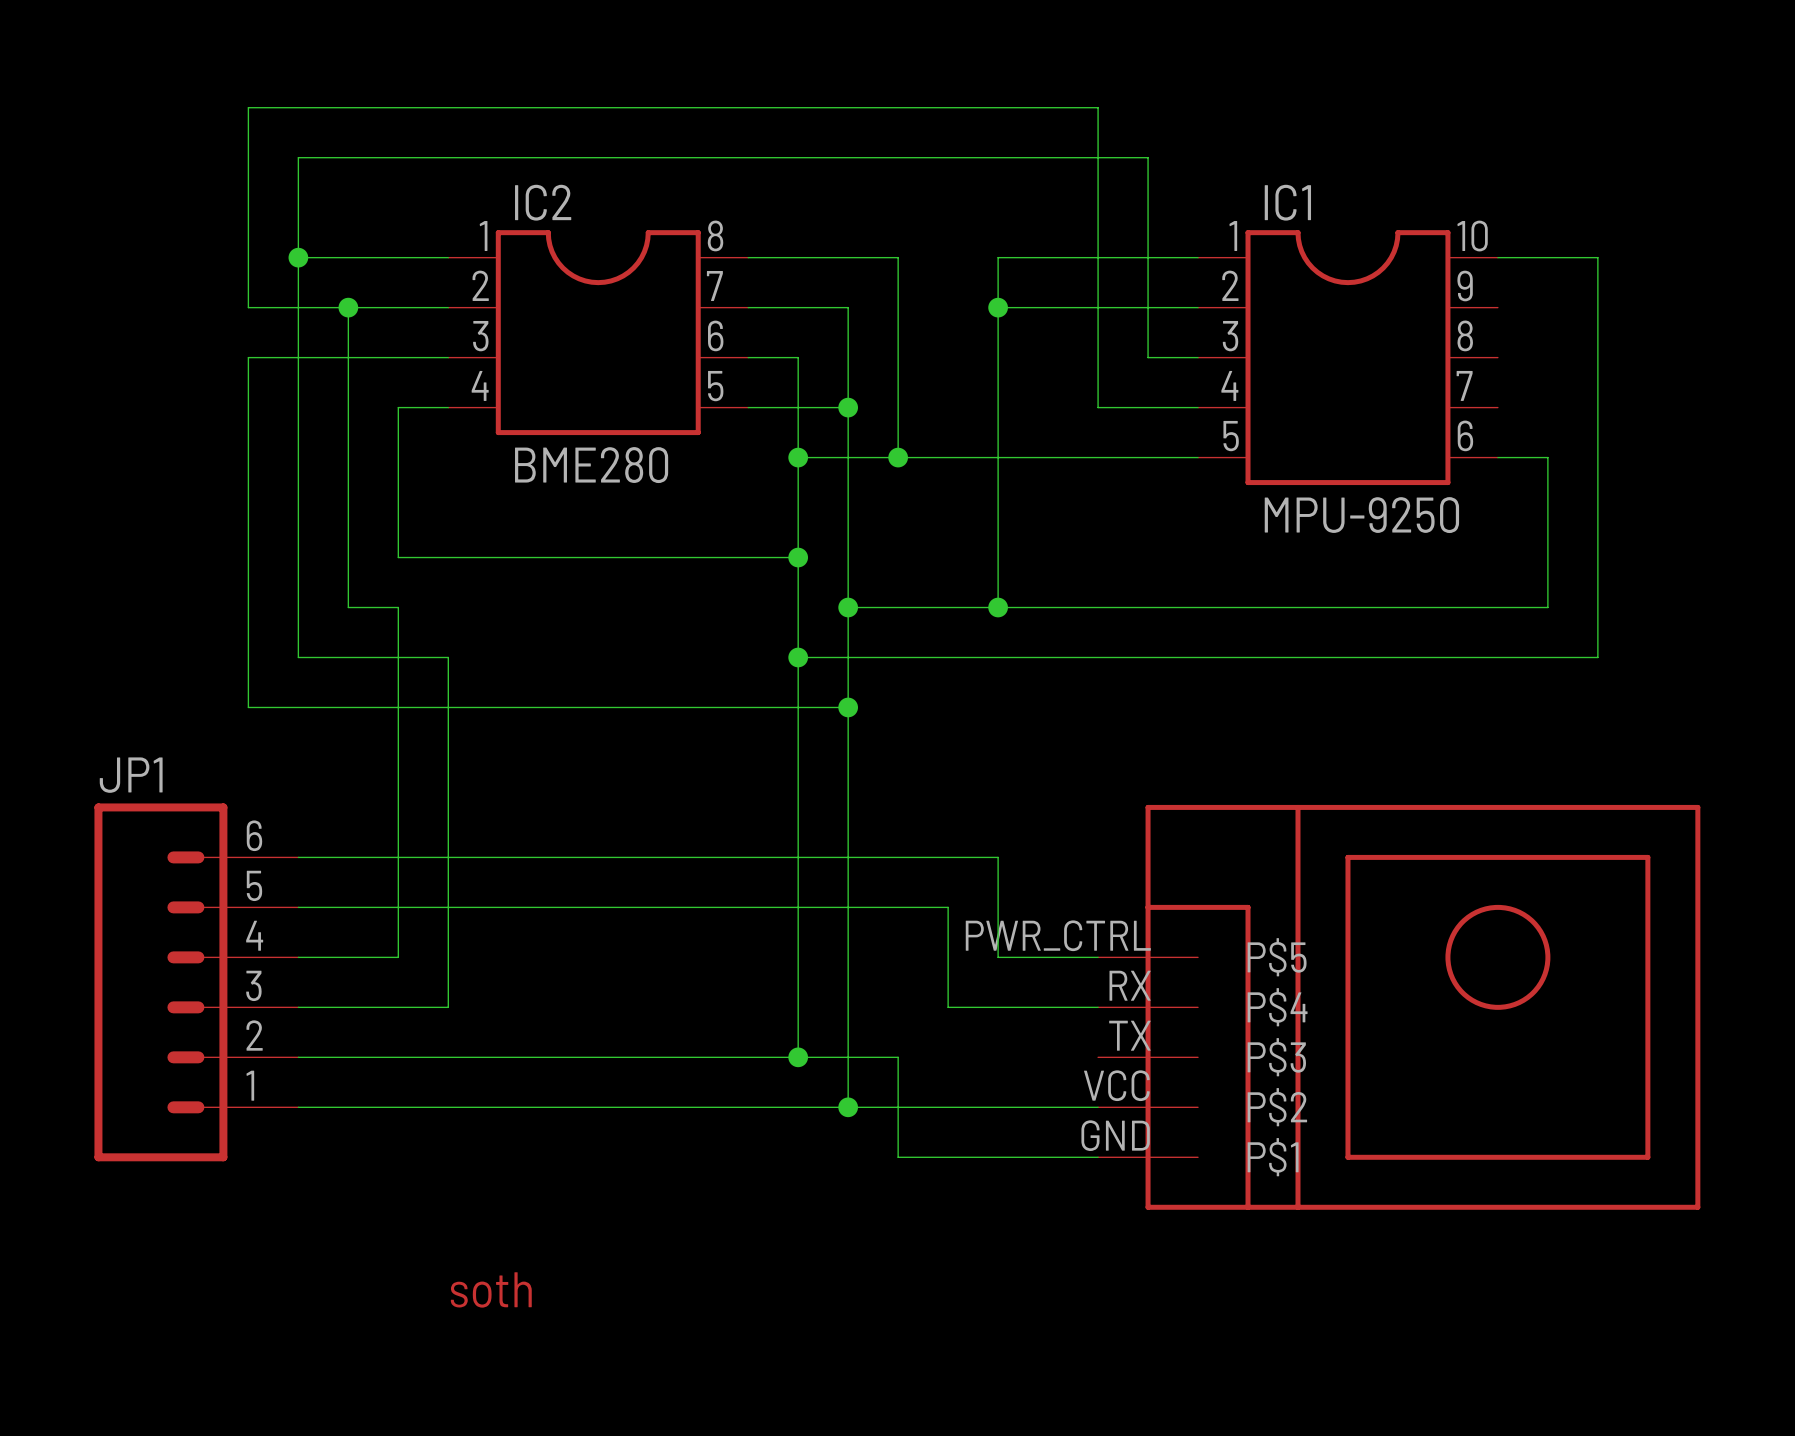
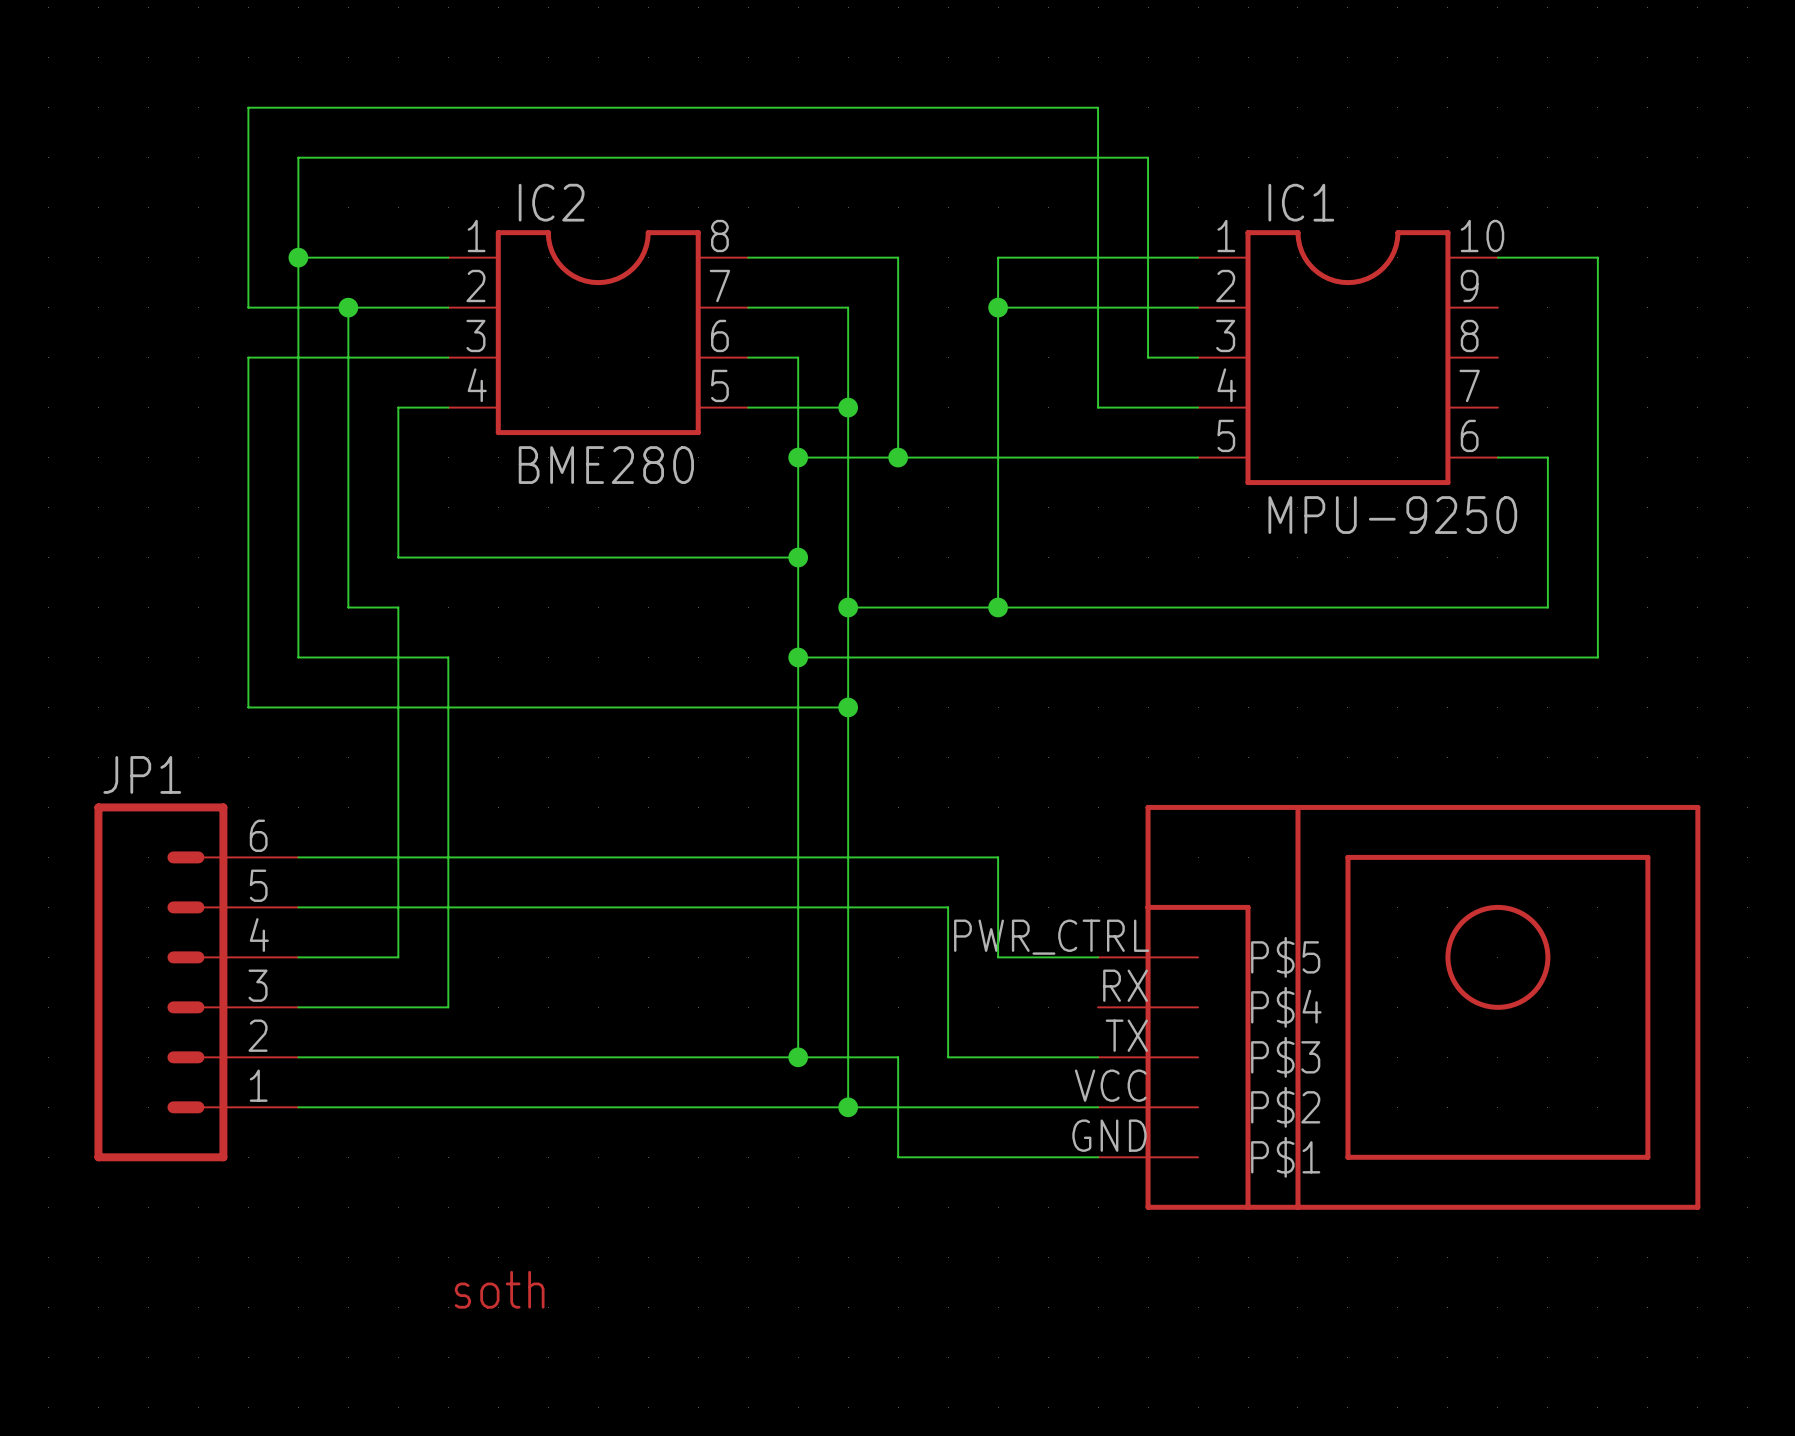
wire: (948, 1007) (1098, 1007) -> (948, 1007) (948, 1057) (1098, 1057)

